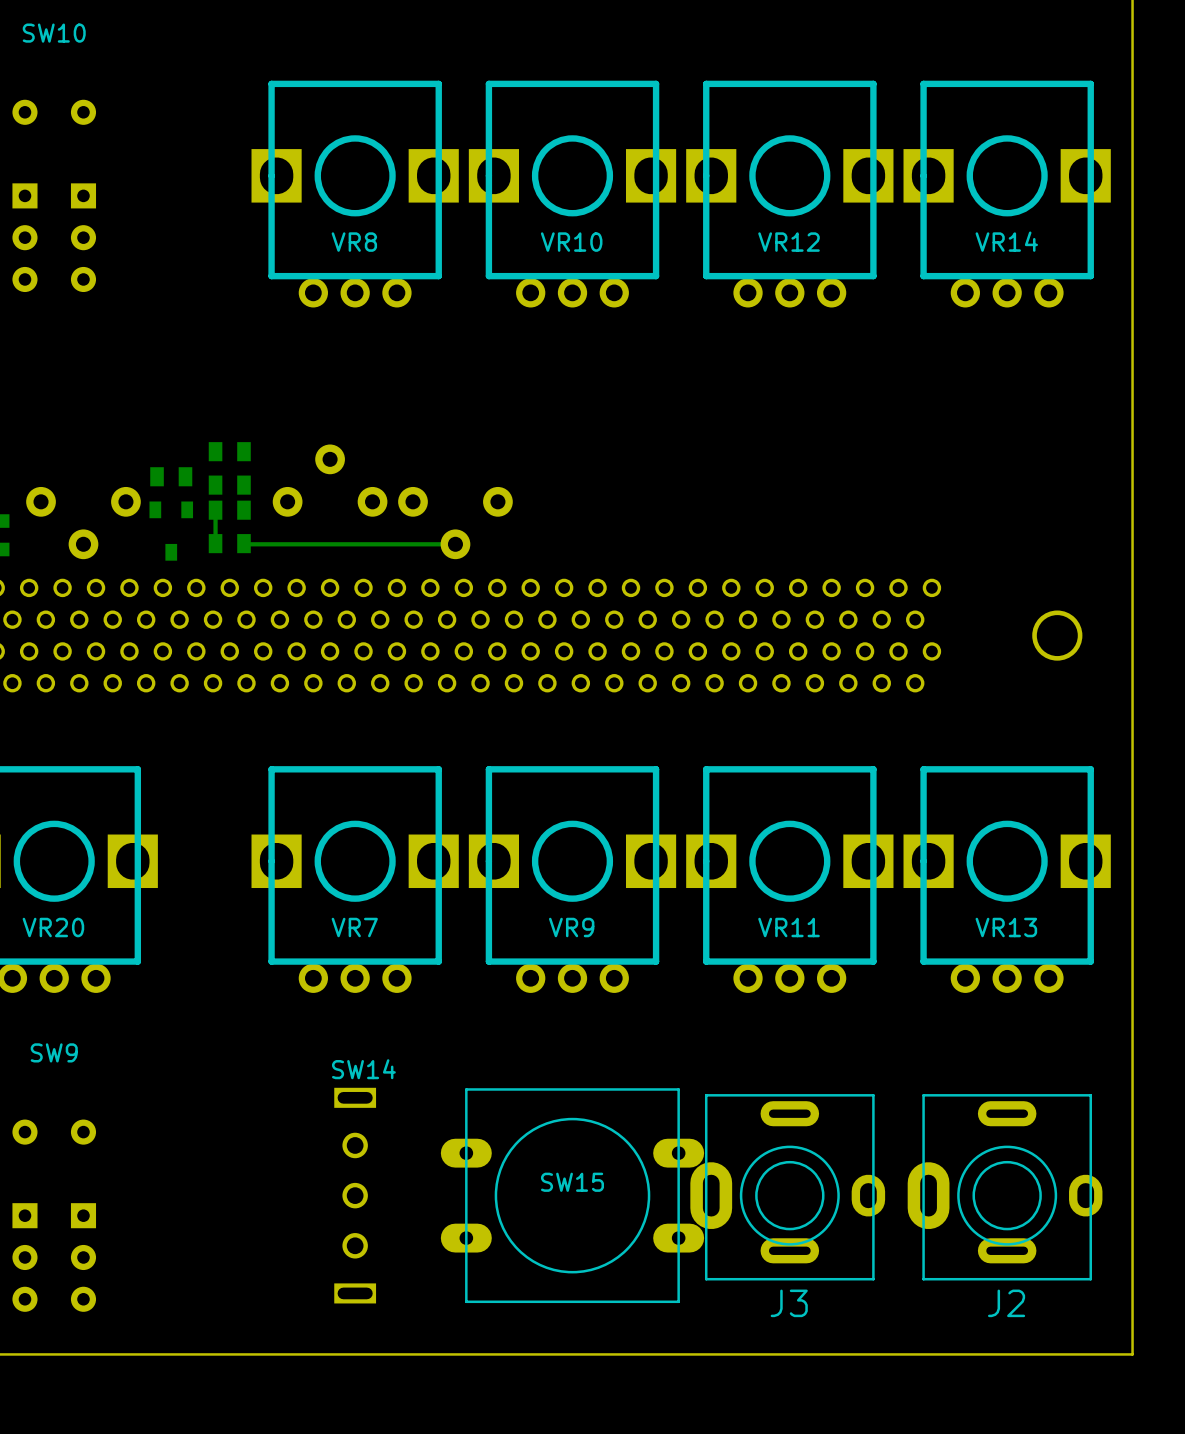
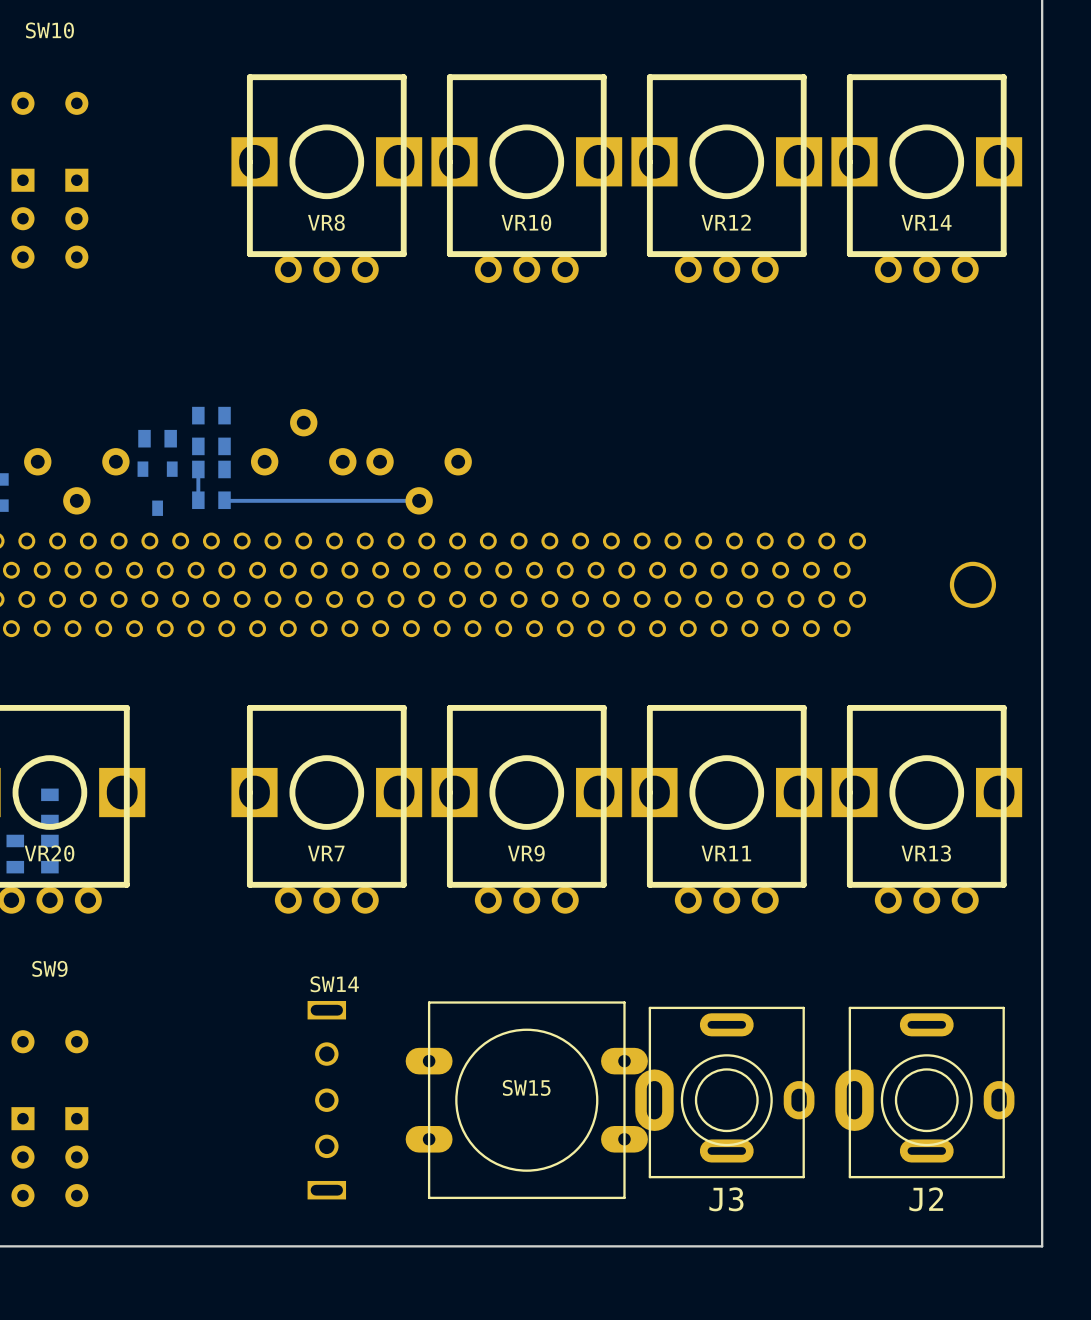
part: none -> (49, 807)
part: none -> (15, 854)
part: none -> (49, 854)

